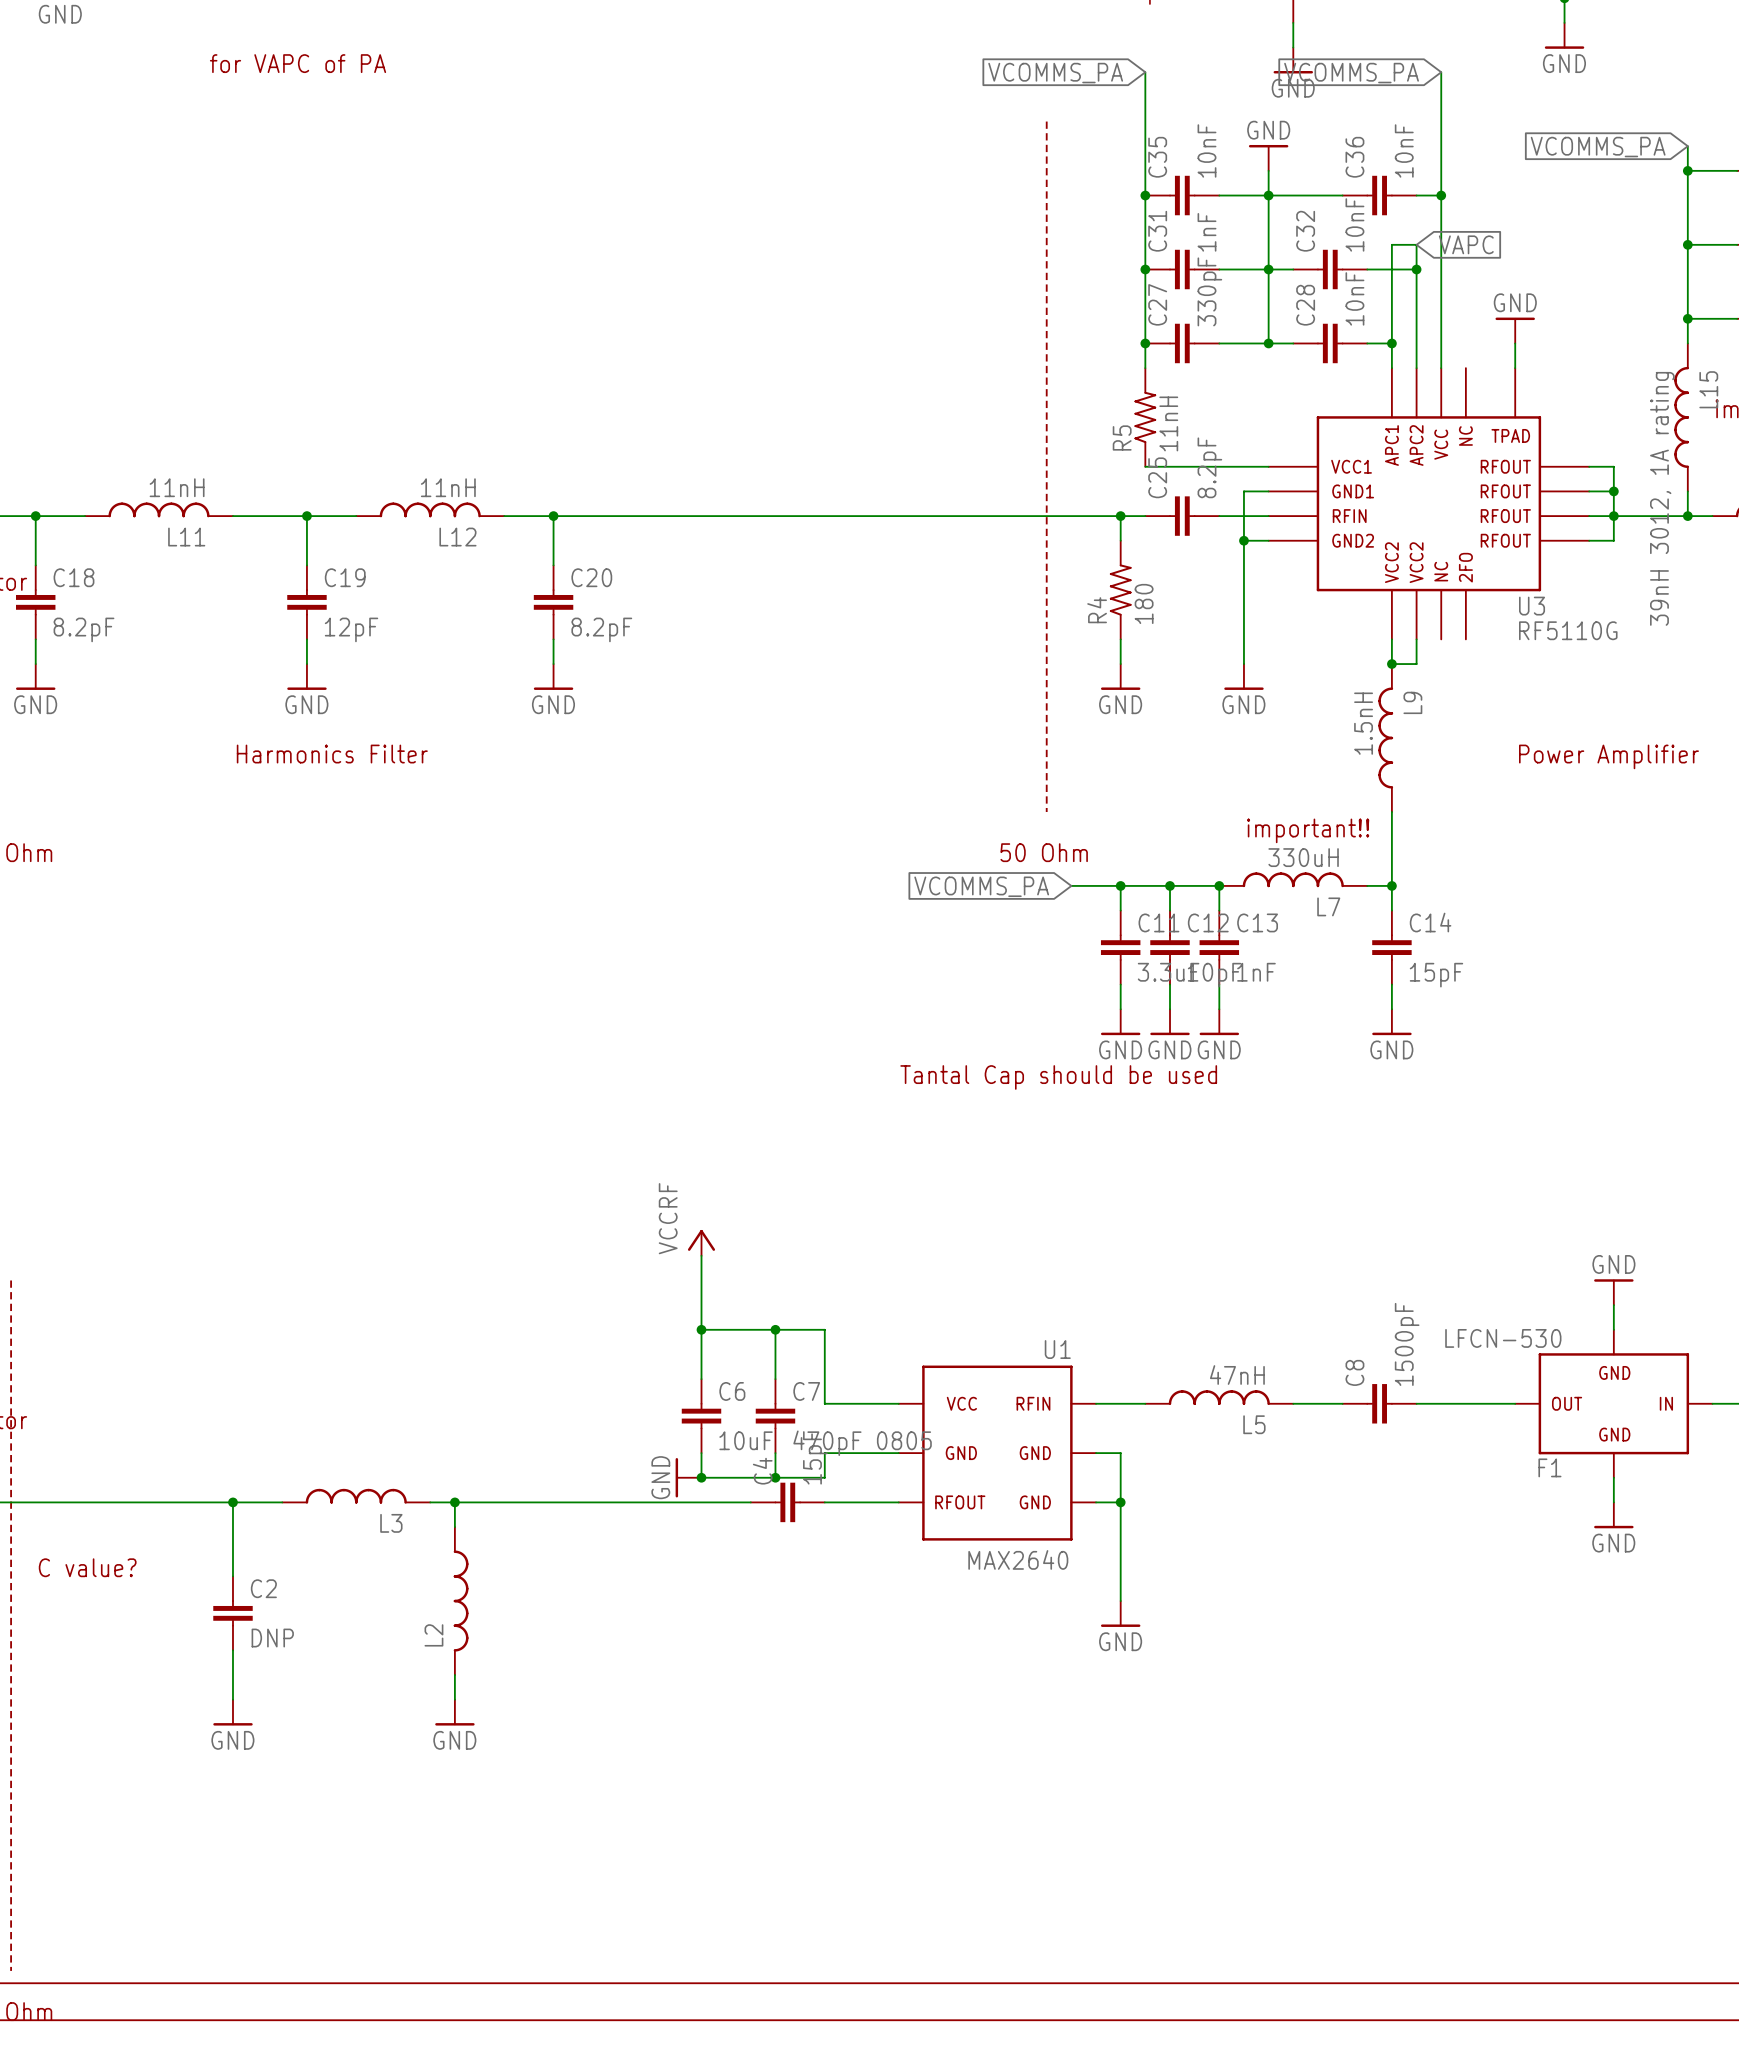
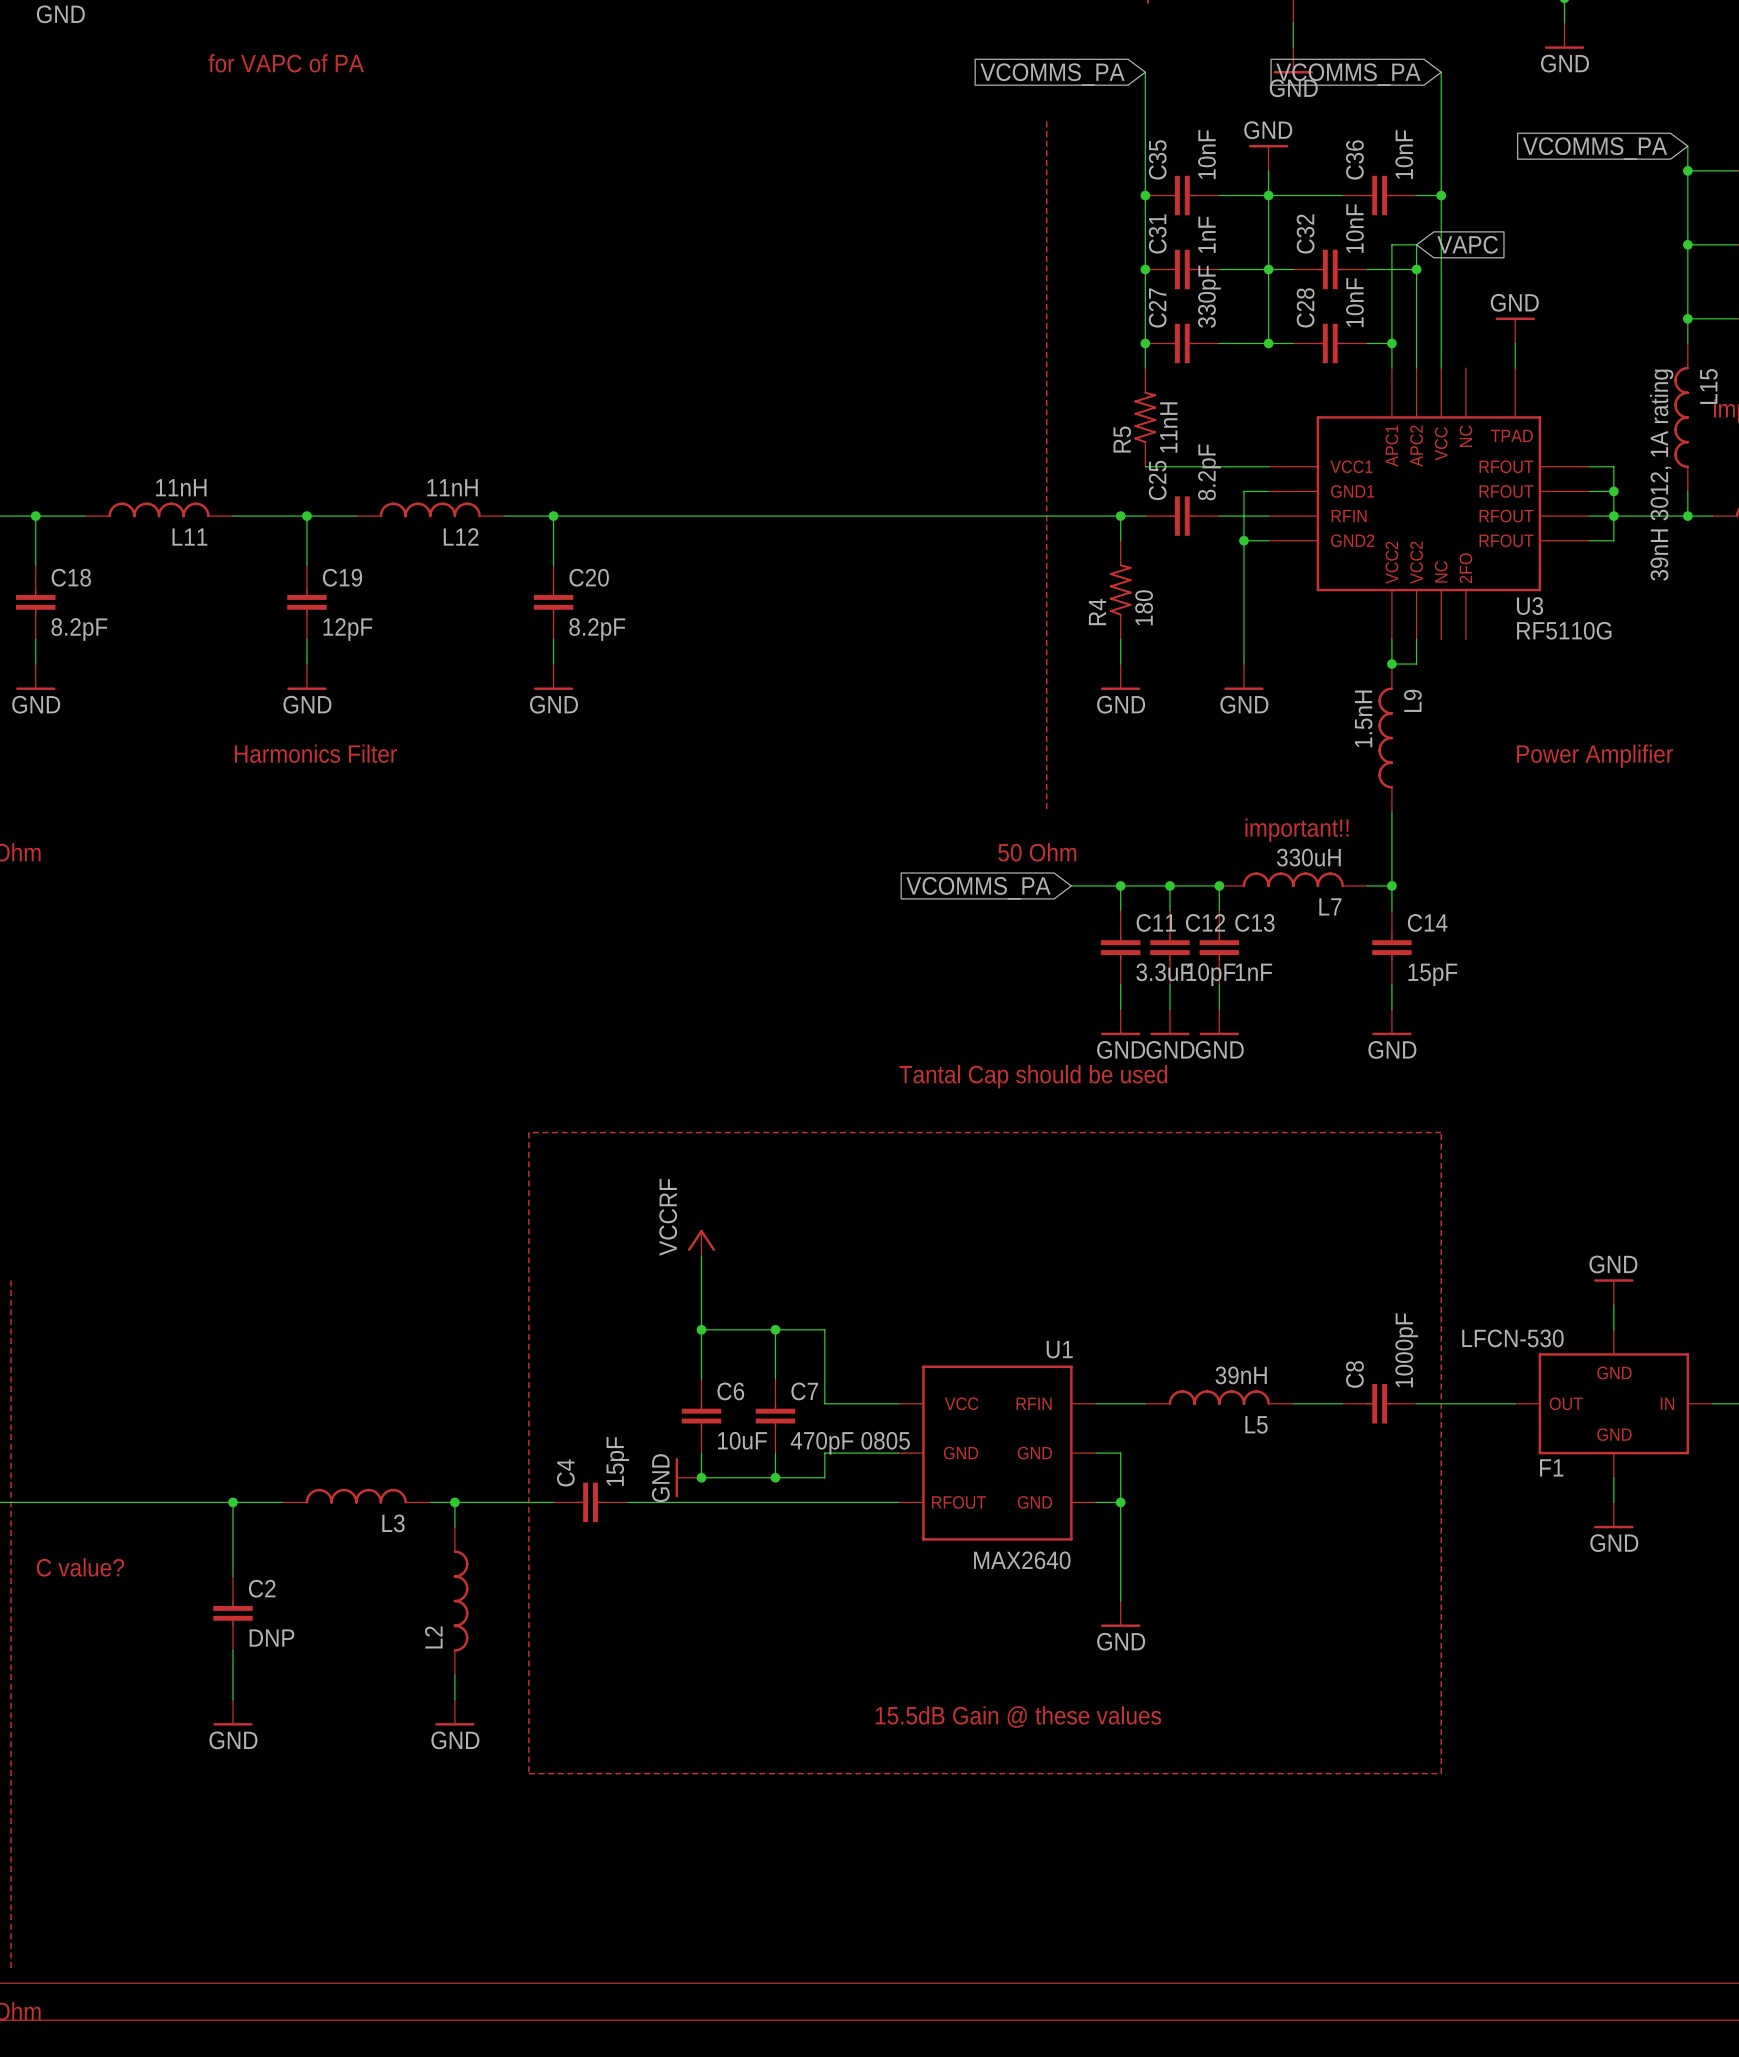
line: none -> (528, 1132) (528, 1773) (1441, 1773) (1441, 1132) (528, 1132)
C8 value: 1500pF (1407, 1344) -> 1000pF (1406, 1350)
L5 value: 47nH (1237, 1375) -> 39nH (1241, 1375)
C4 position: (787, 1502) -> (590, 1502)
text: none -> 15.5dB Gain @ these values (1018, 1716)

